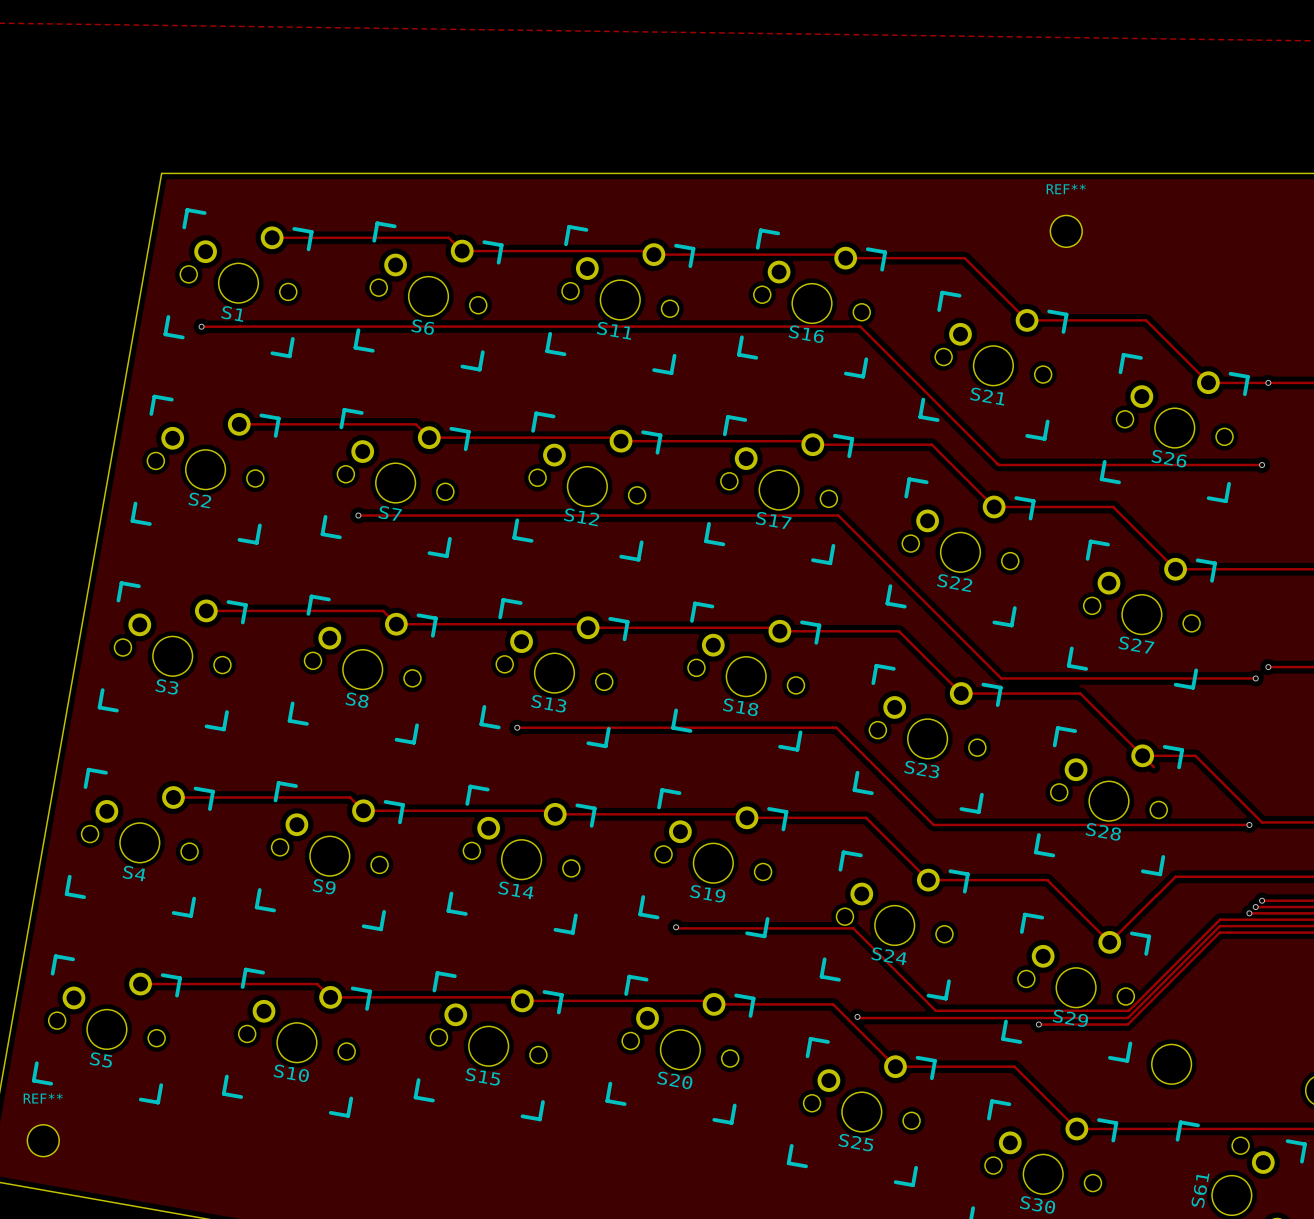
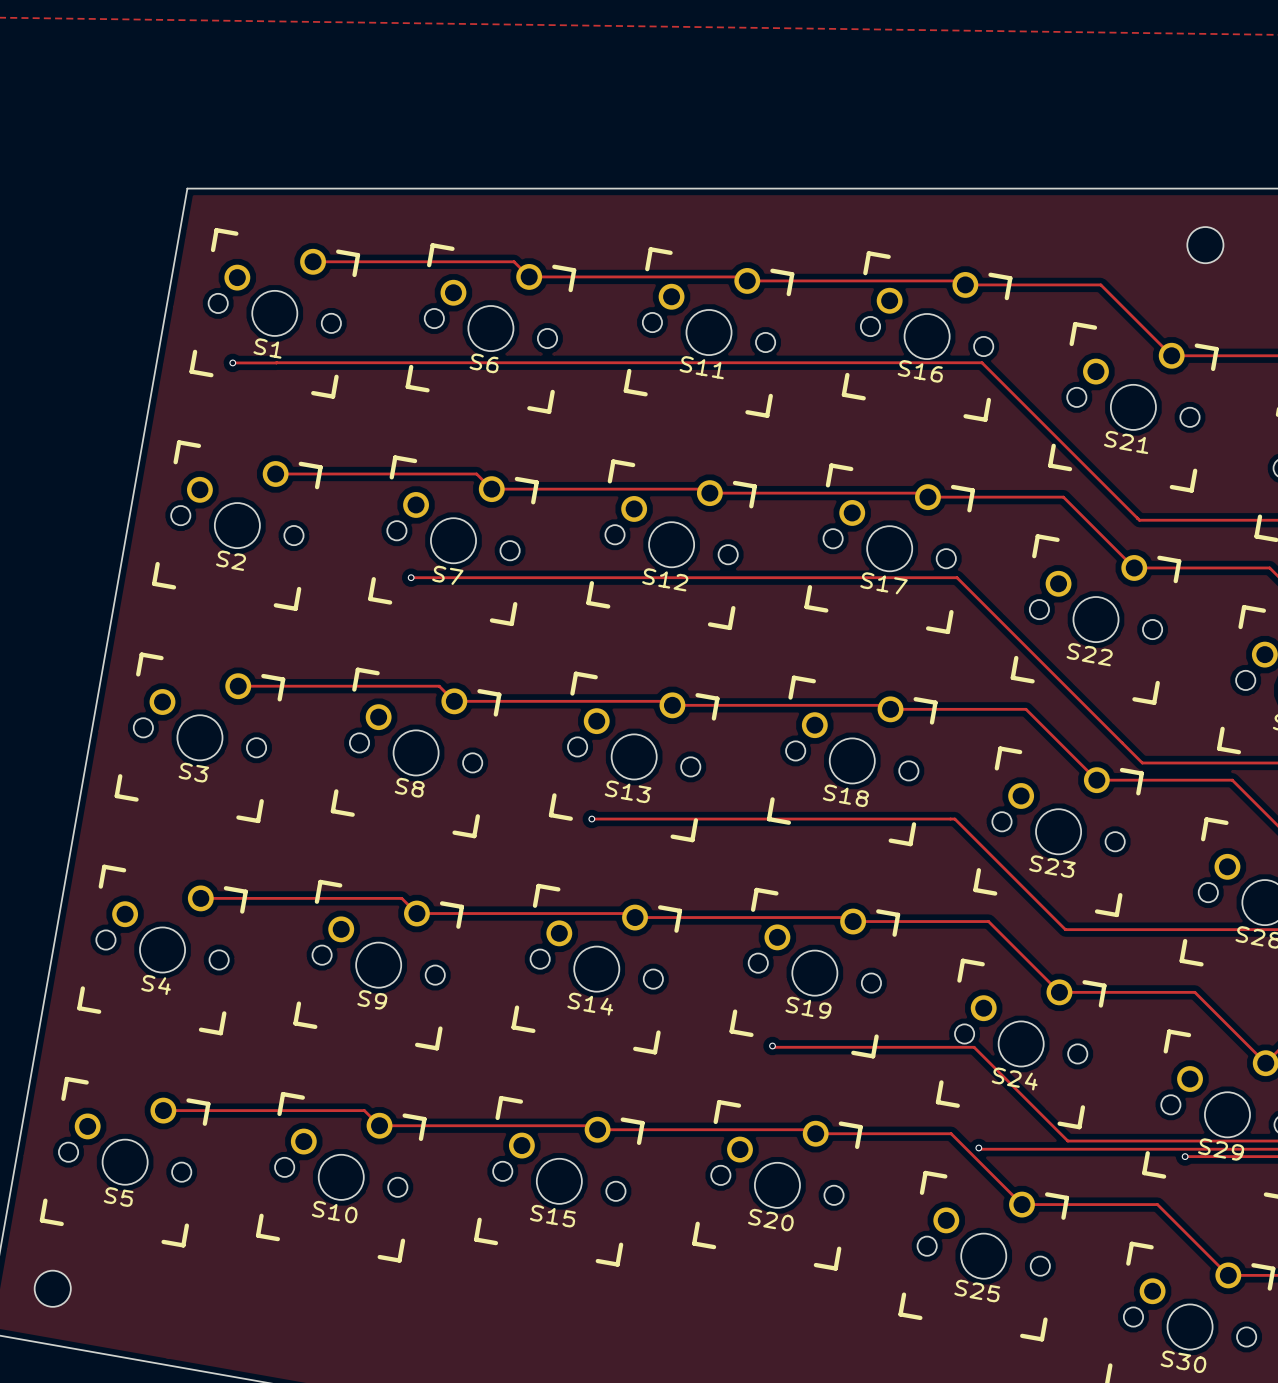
part: none -> (1205, 245)
REF**: (1066, 231) -> none
REF** name: REF** (43, 1098) -> none

